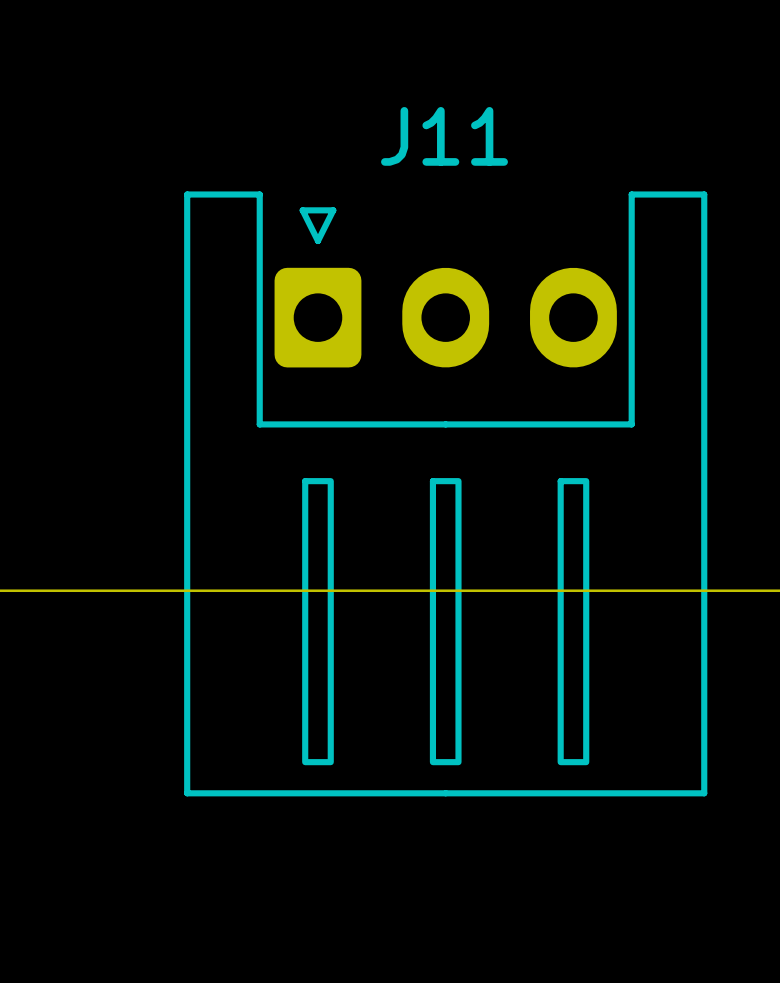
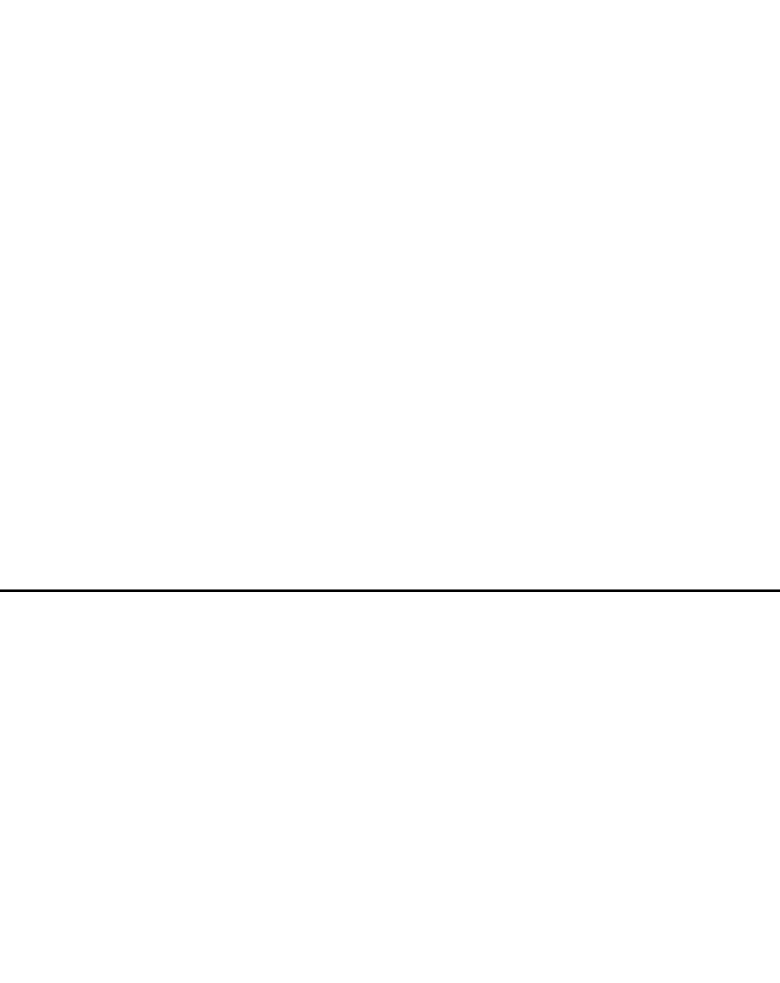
J11: (445, 493) -> none

